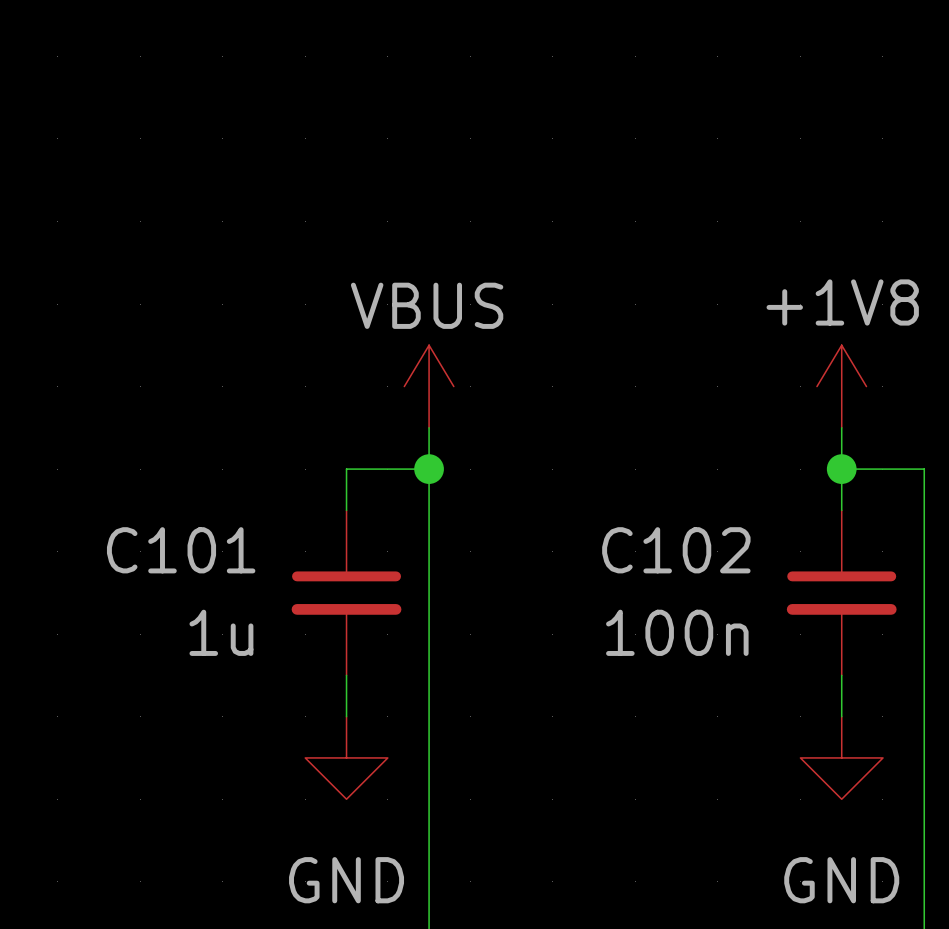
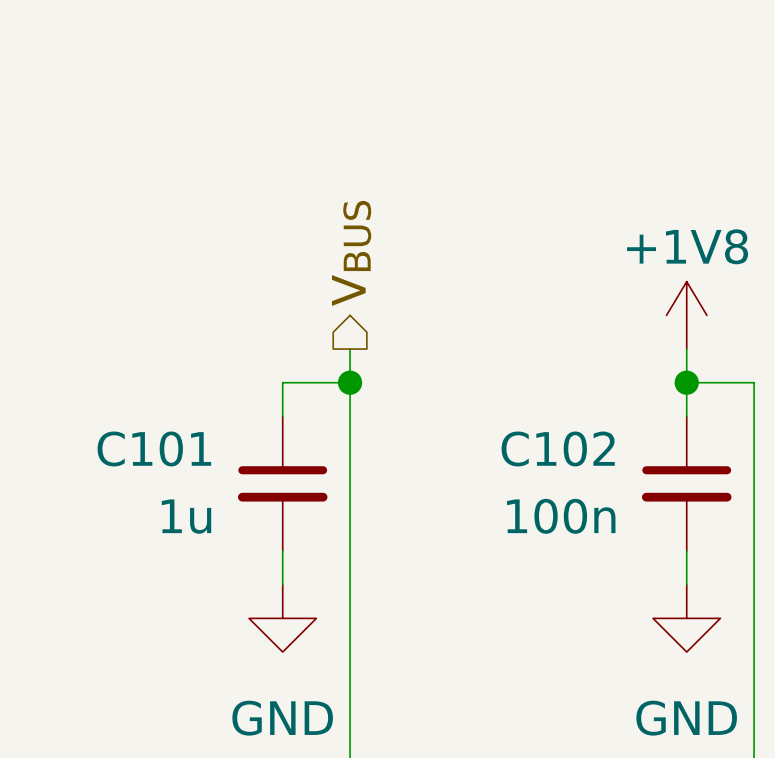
hierarchical label: none -> VBUS (351, 253)
power symbol: VBUS (429, 386) -> none

